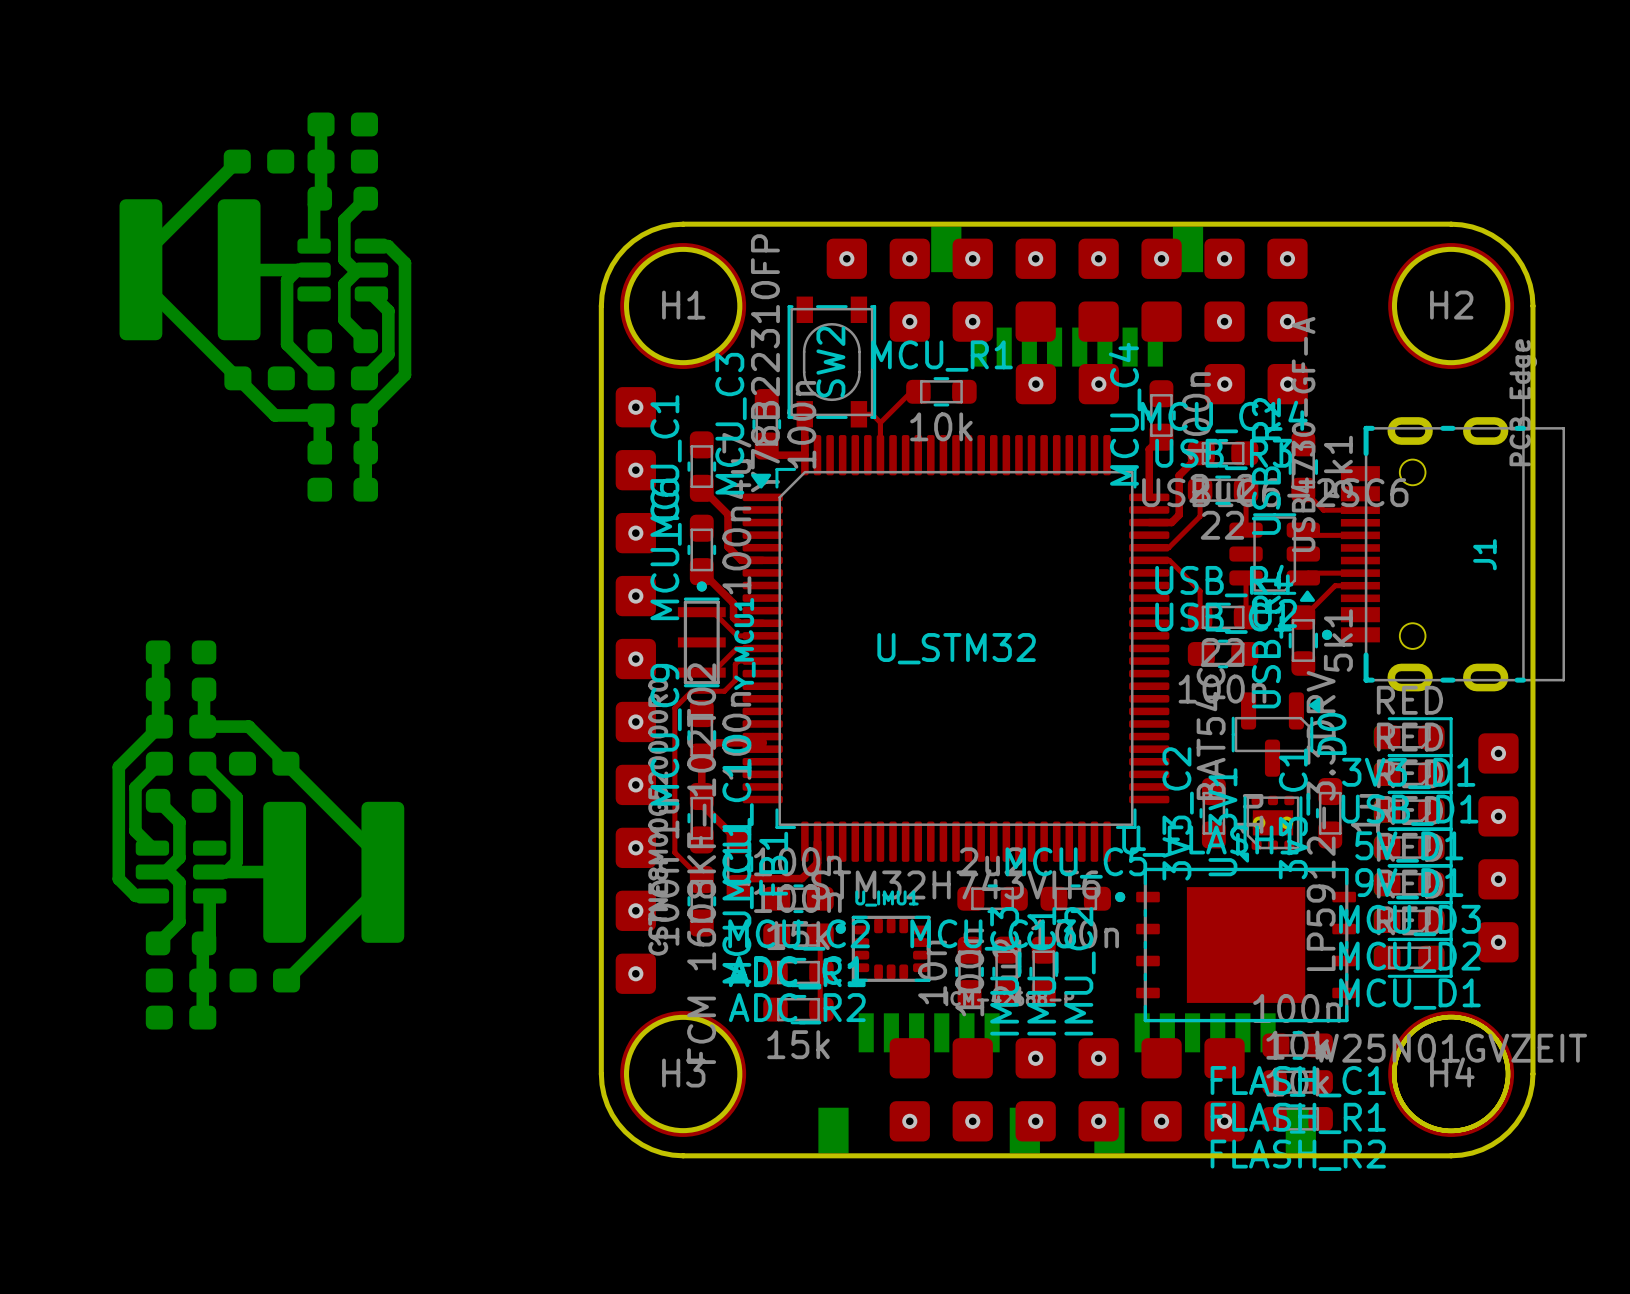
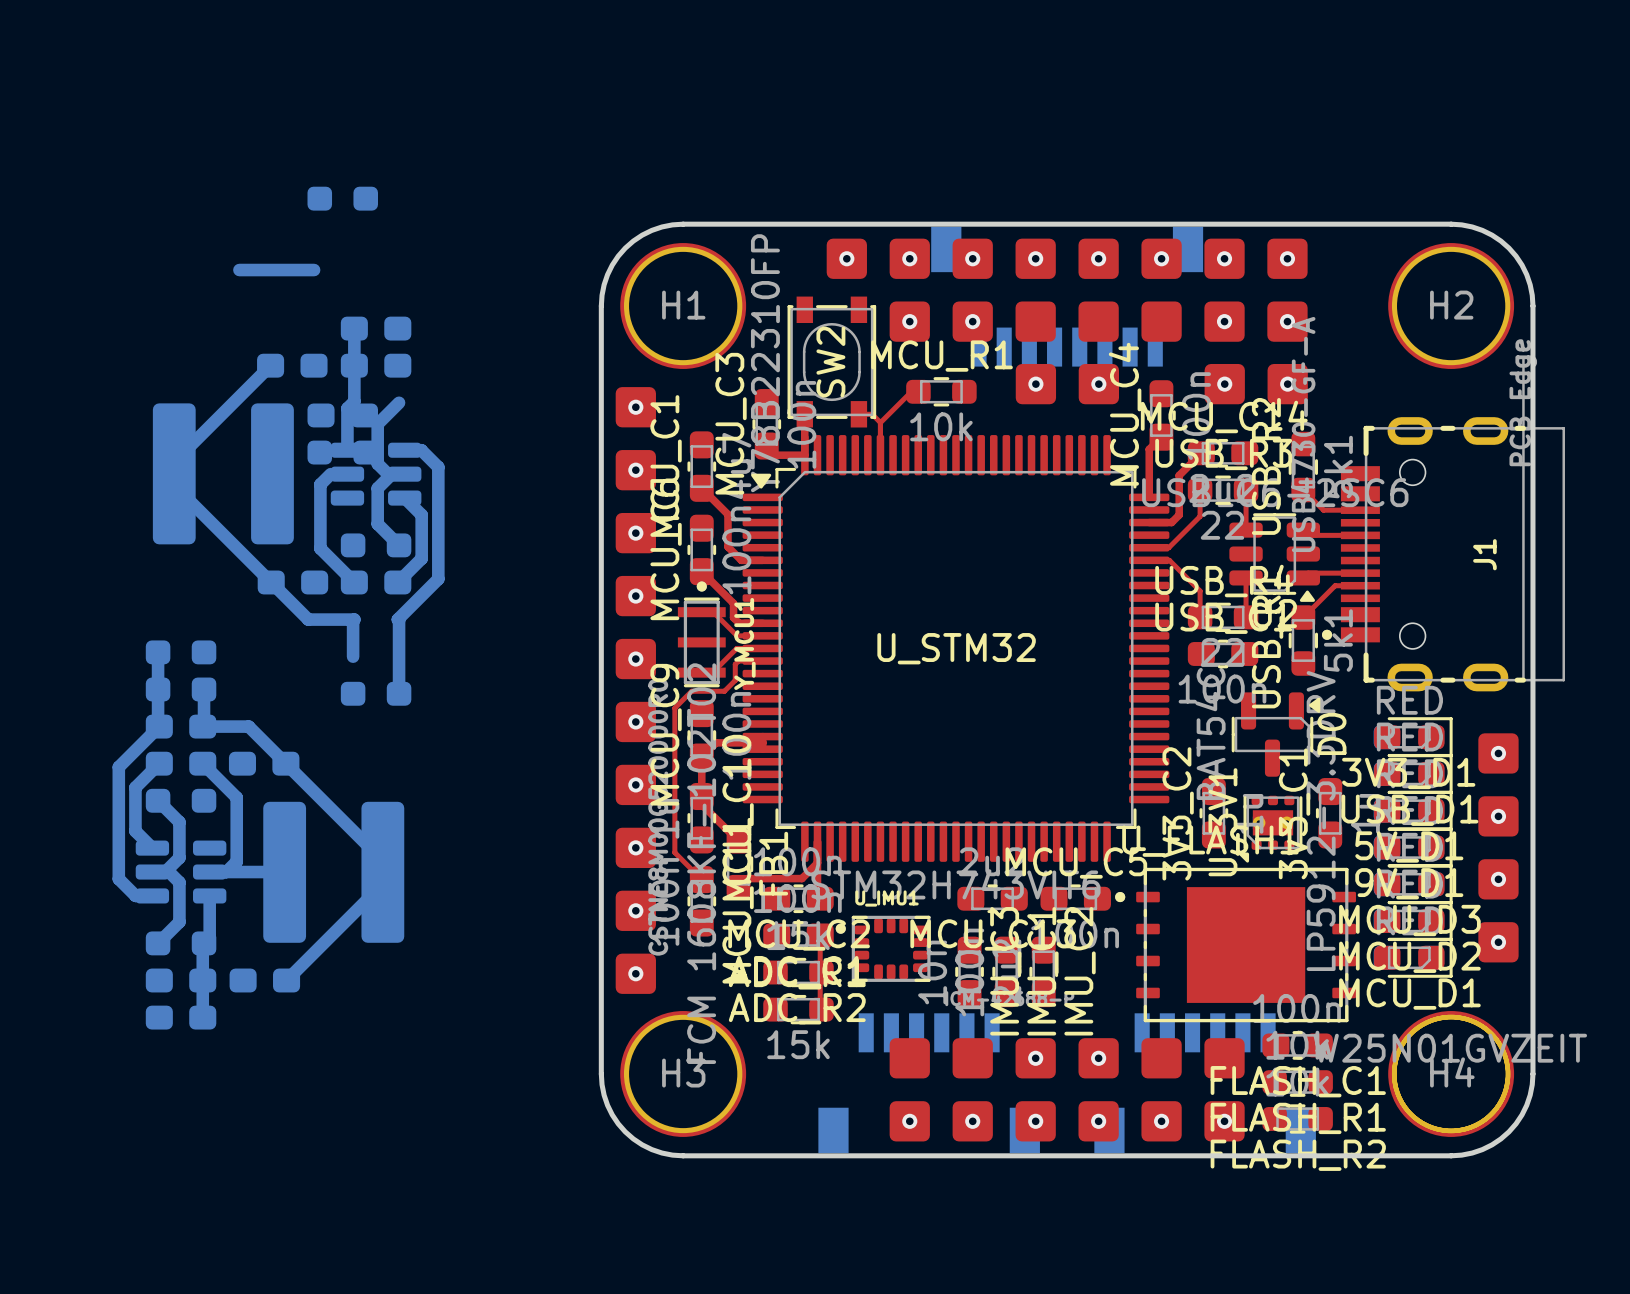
bottom track: (321, 124) (321, 197) (314, 204) (314, 246) -> (354, 328) (354, 401) (347, 408) (347, 450)
part: (342, 124) -> none
bottom track: (237, 161) (140, 257) (140, 281) (274, 415) (321, 415) (319, 452) -> (270, 365) (174, 461) (174, 485) (308, 619) (354, 619) (353, 656)
part: (258, 161) -> none
part: (342, 161) -> none
bottom track: (365, 198) (344, 220) (344, 259) (354, 270) (371, 270) -> (399, 402) (377, 424) (377, 463) (388, 474) (404, 474)
bottom track: (371, 246) (388, 246) (404, 263) (404, 374) (364, 415) (365, 489) -> (404, 450) (421, 450) (438, 467) (438, 579) (397, 619) (399, 693)
part position: (190, 269) -> (223, 473)
bottom track: (297, 270) (287, 280) (287, 344) (321, 378) -> (330, 474) (320, 484) (320, 548) (354, 582)
part position: (342, 270) -> (376, 474)
bottom track: (358, 270) (344, 284) (344, 319) (365, 341) -> (391, 474) (377, 488) (377, 524) (399, 545)
bottom track: (371, 293) (388, 310) (388, 354) (364, 378) -> (404, 498) (421, 515) (421, 558) (397, 582)
part: none -> (376, 328)
part: (342, 341) -> none
part: none -> (292, 365)
part: none -> (376, 365)
part: (259, 378) -> none
part: (342, 378) -> none
part position: (342, 489) -> (376, 545)
part: none -> (292, 582)
part: none -> (376, 582)
part: none -> (376, 693)

